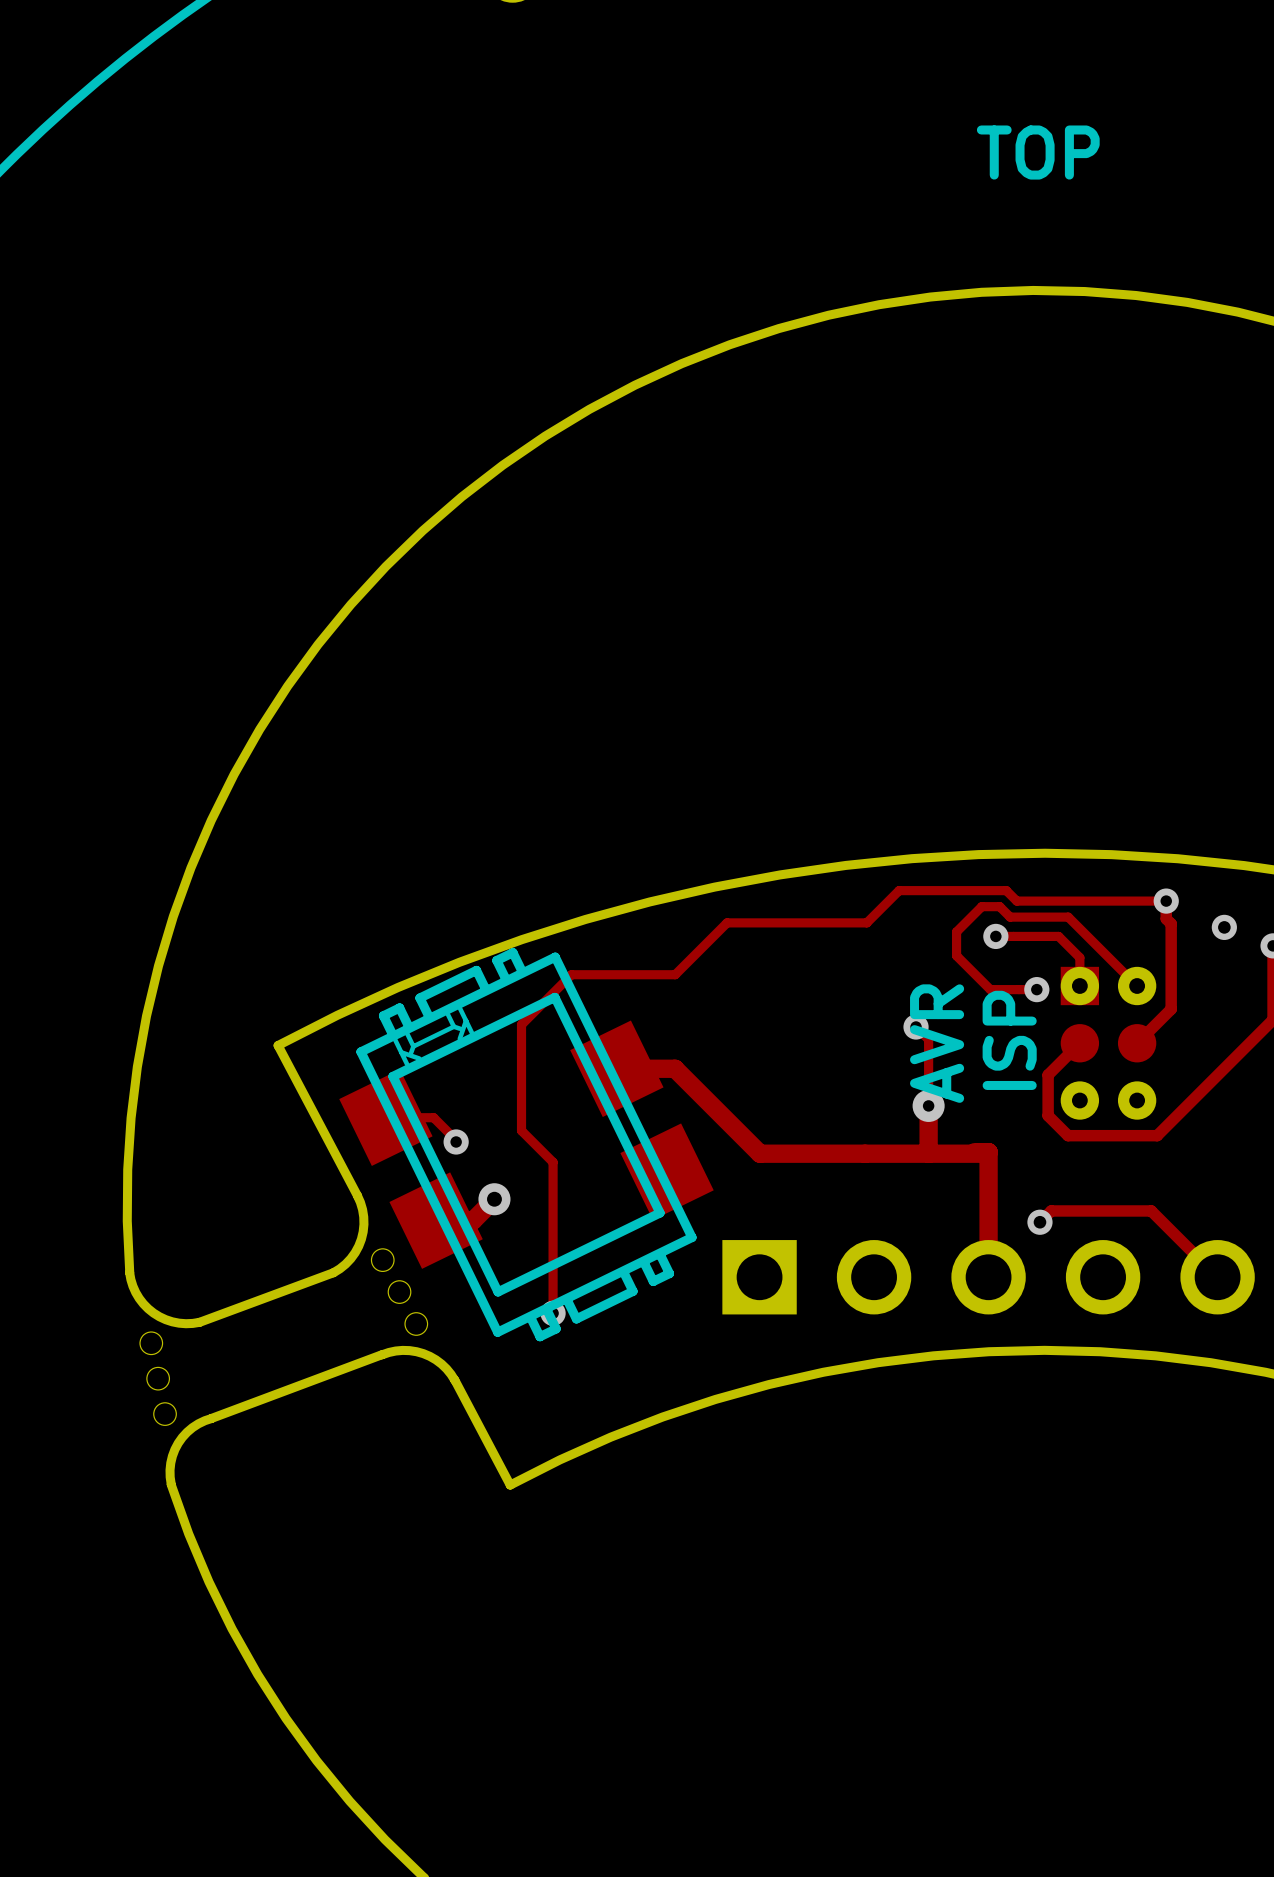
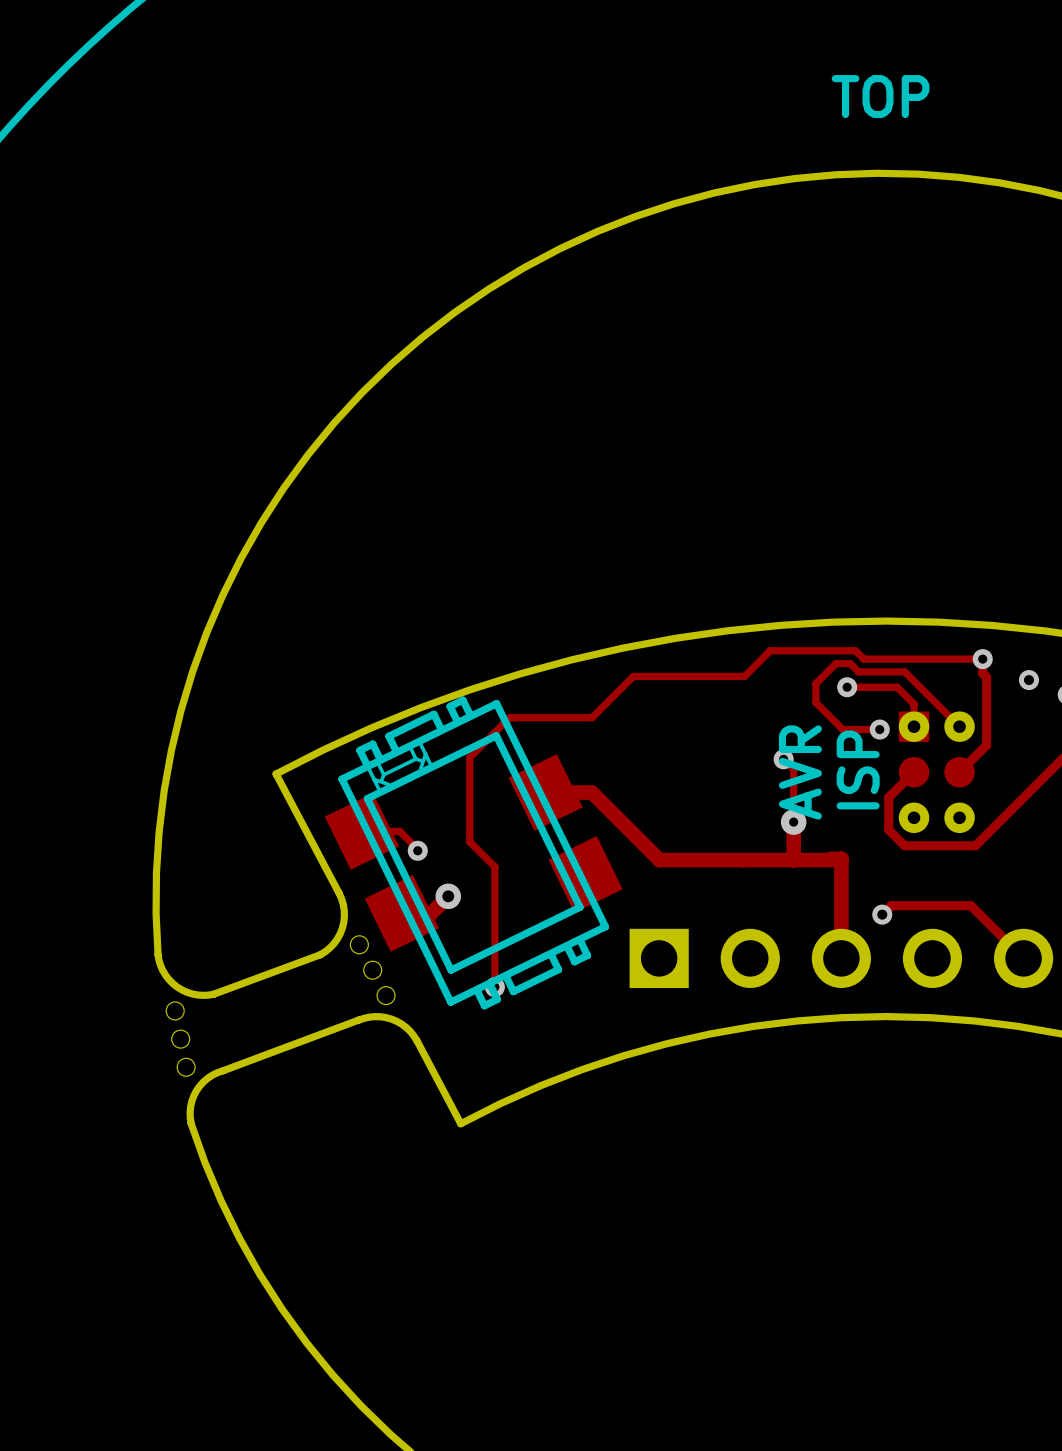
text position: TOP (1038, 152) -> TOP (880, 96)

